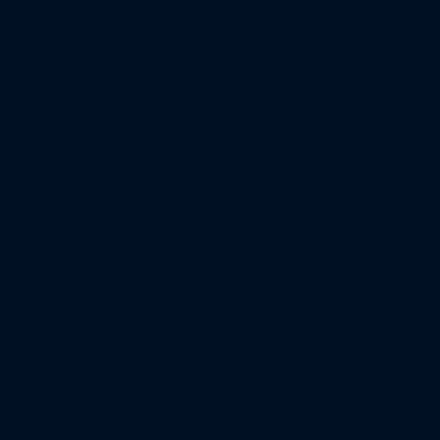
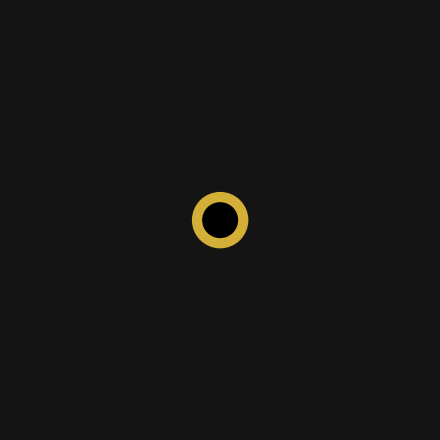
part: none -> (220, 220)

